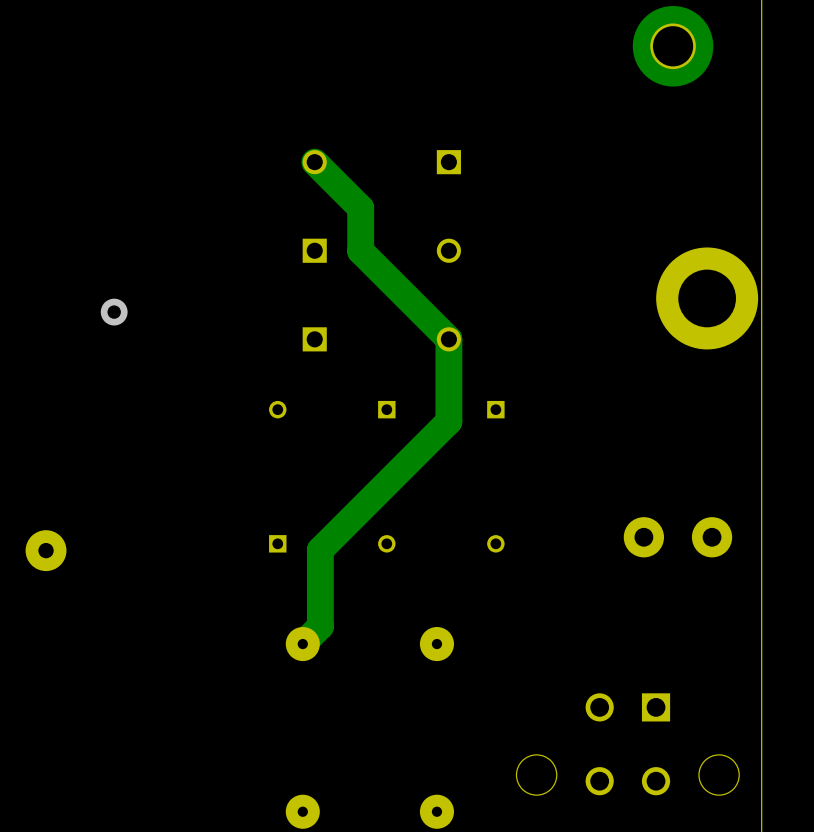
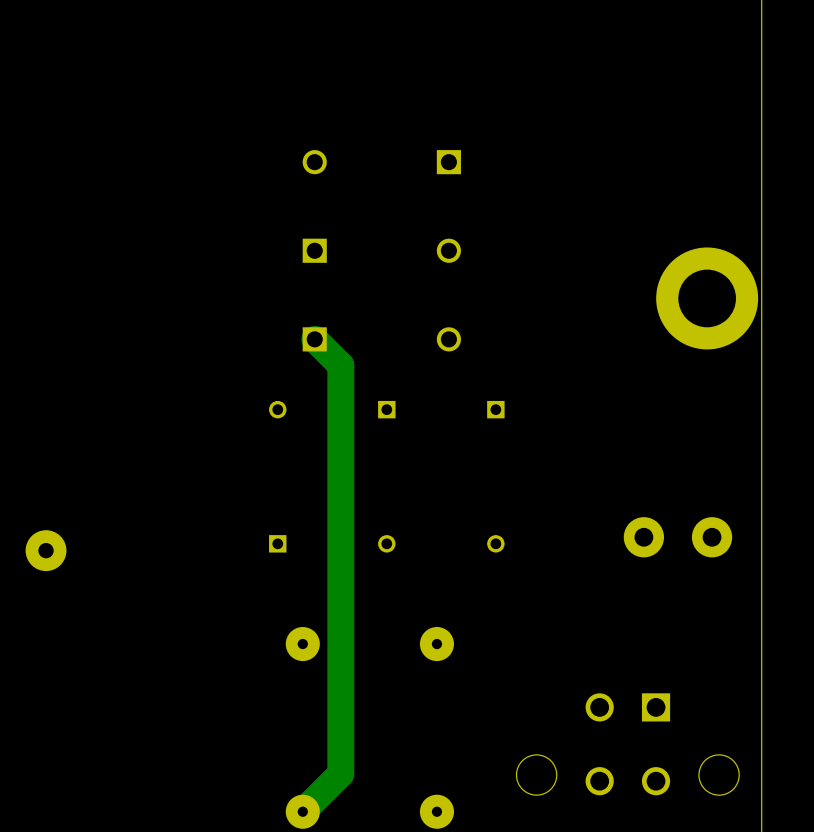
part: (673, 46) -> none
track: (314, 162) (360, 208) (360, 251) (448, 339) (448, 421) (320, 550) (320, 626) (302, 644) -> none
via: (114, 312) -> none
track: none -> (314, 339) (340, 365) (340, 773) (302, 811)

